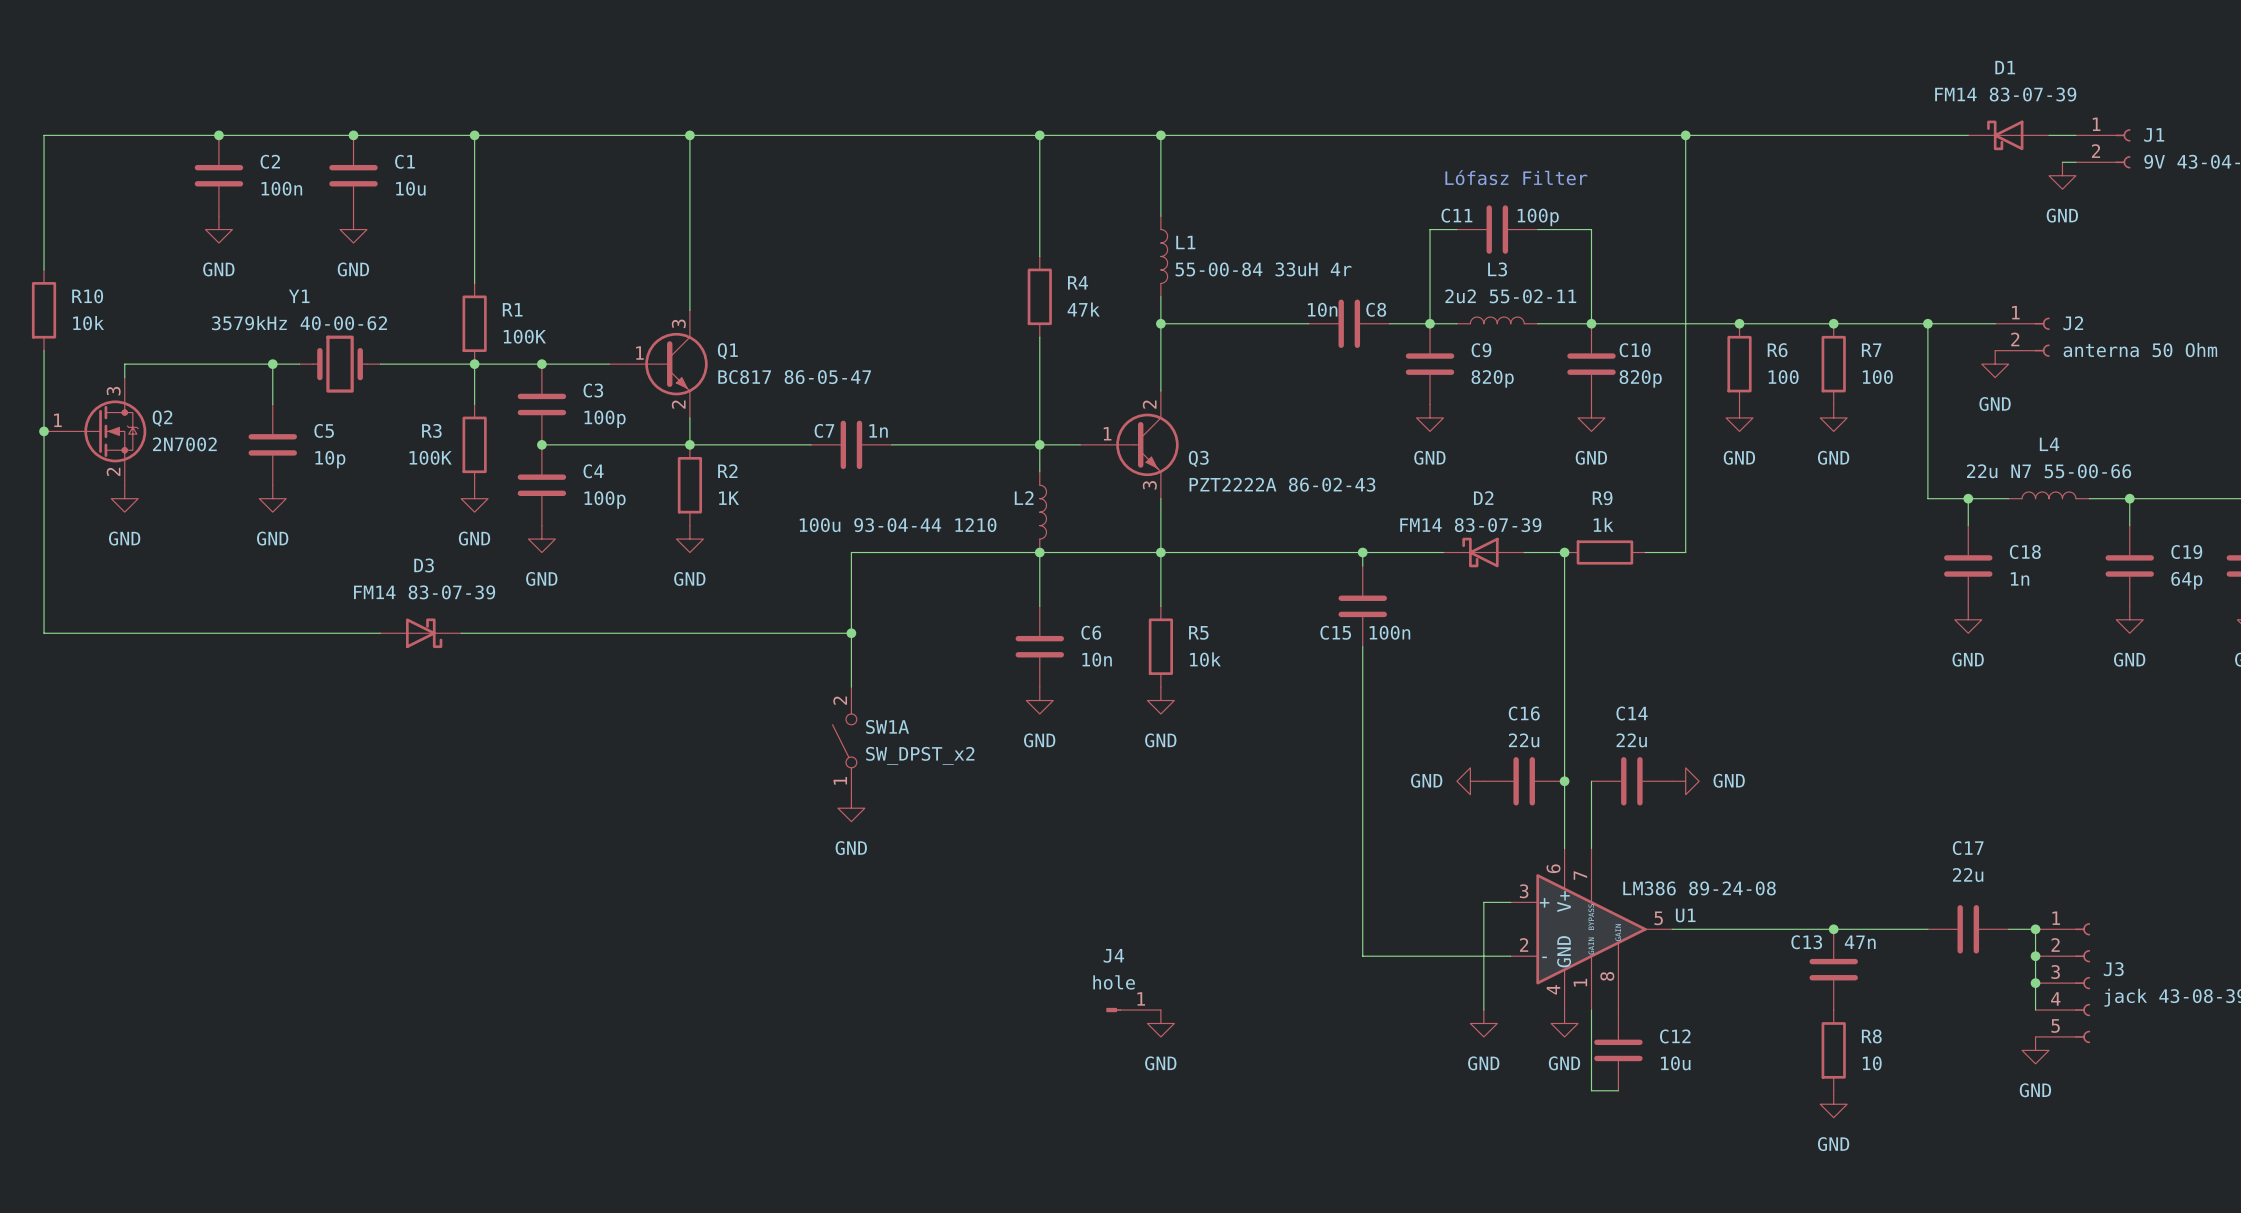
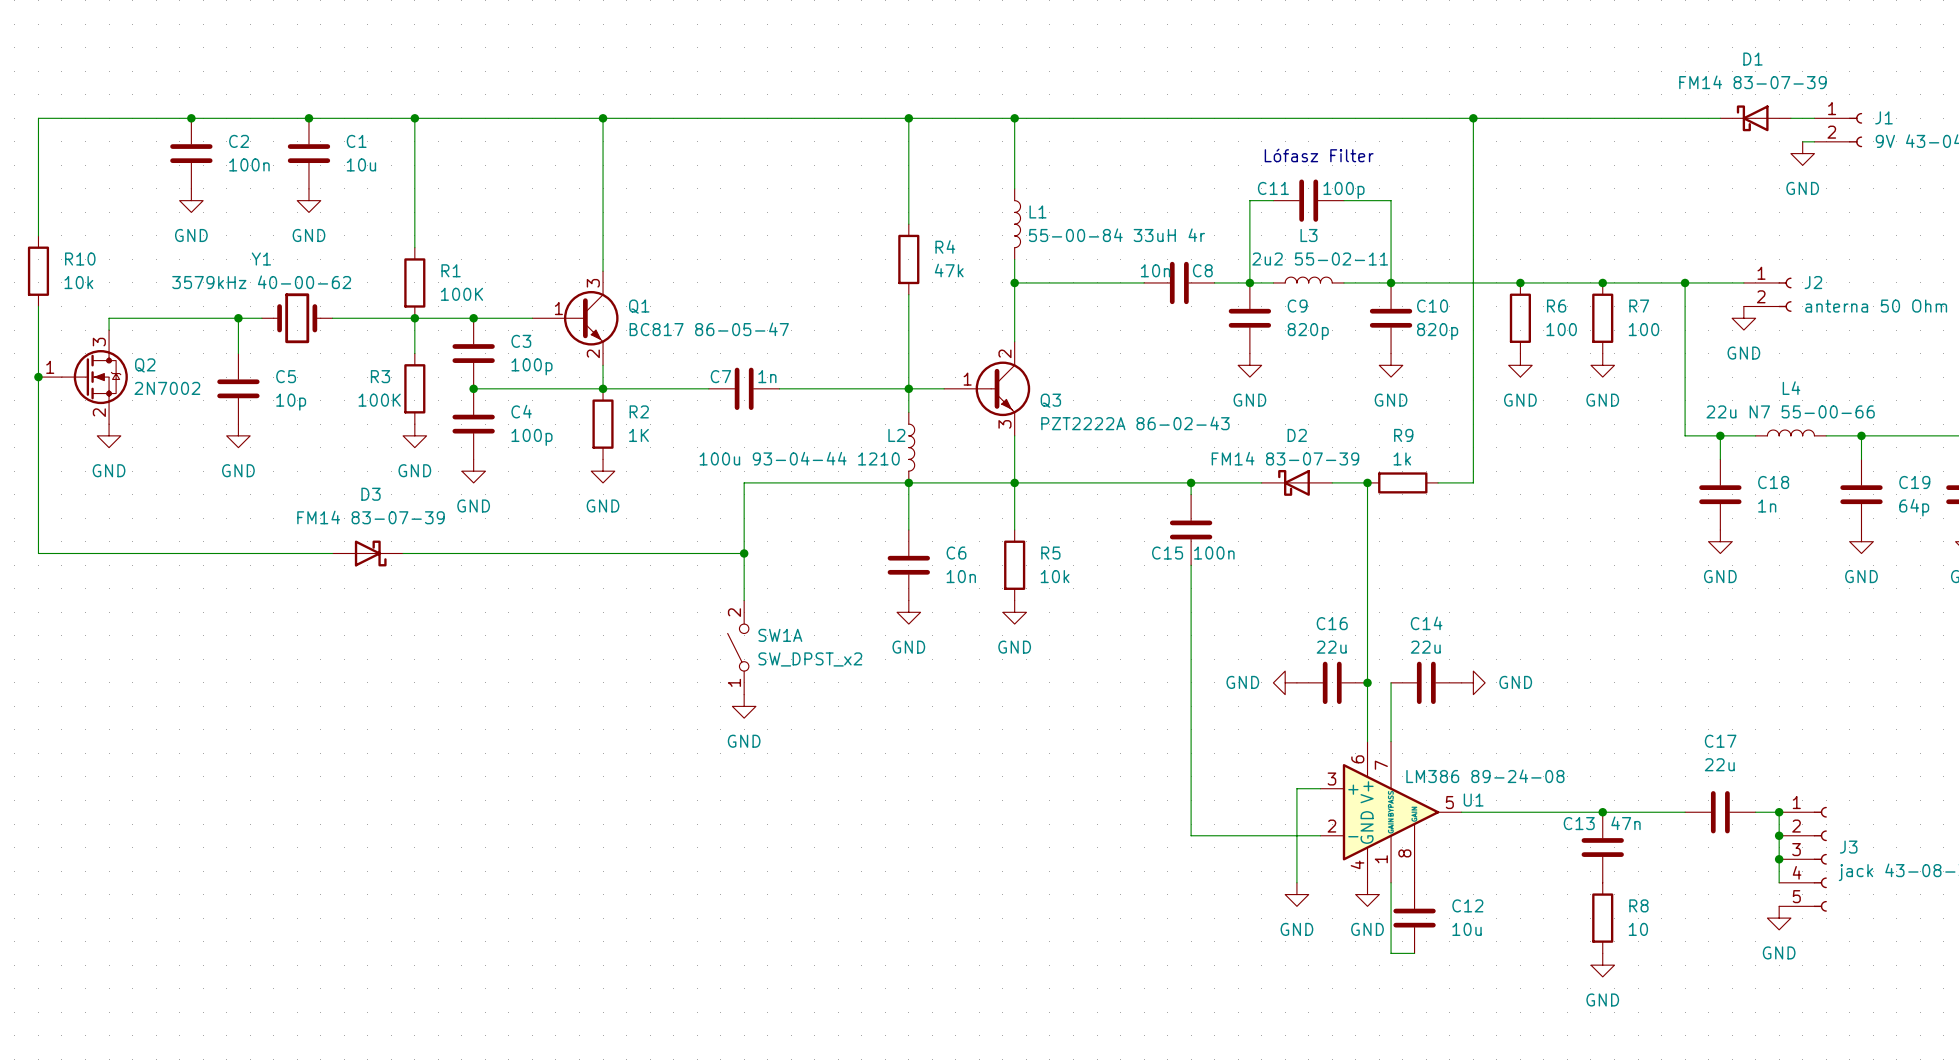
J4: hole (1133, 1010) -> none
power symbol: GND (1160, 1023) -> none

